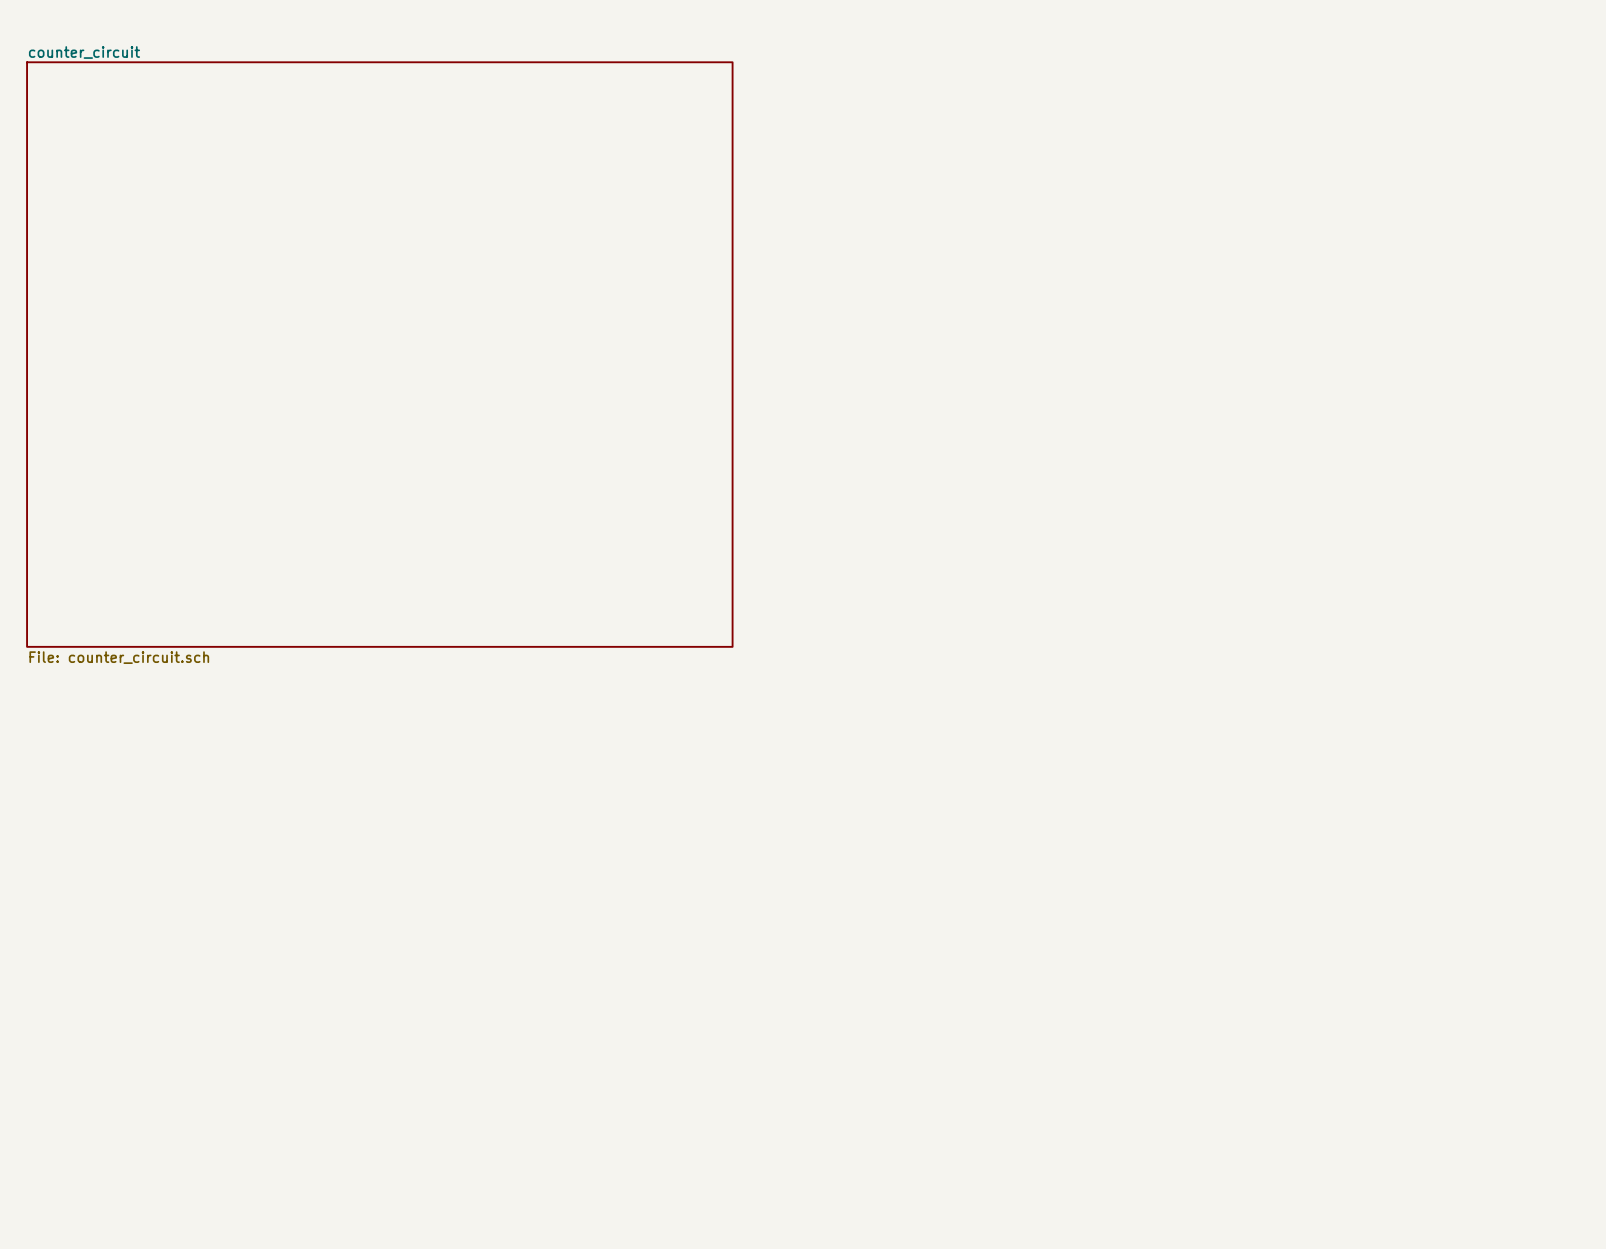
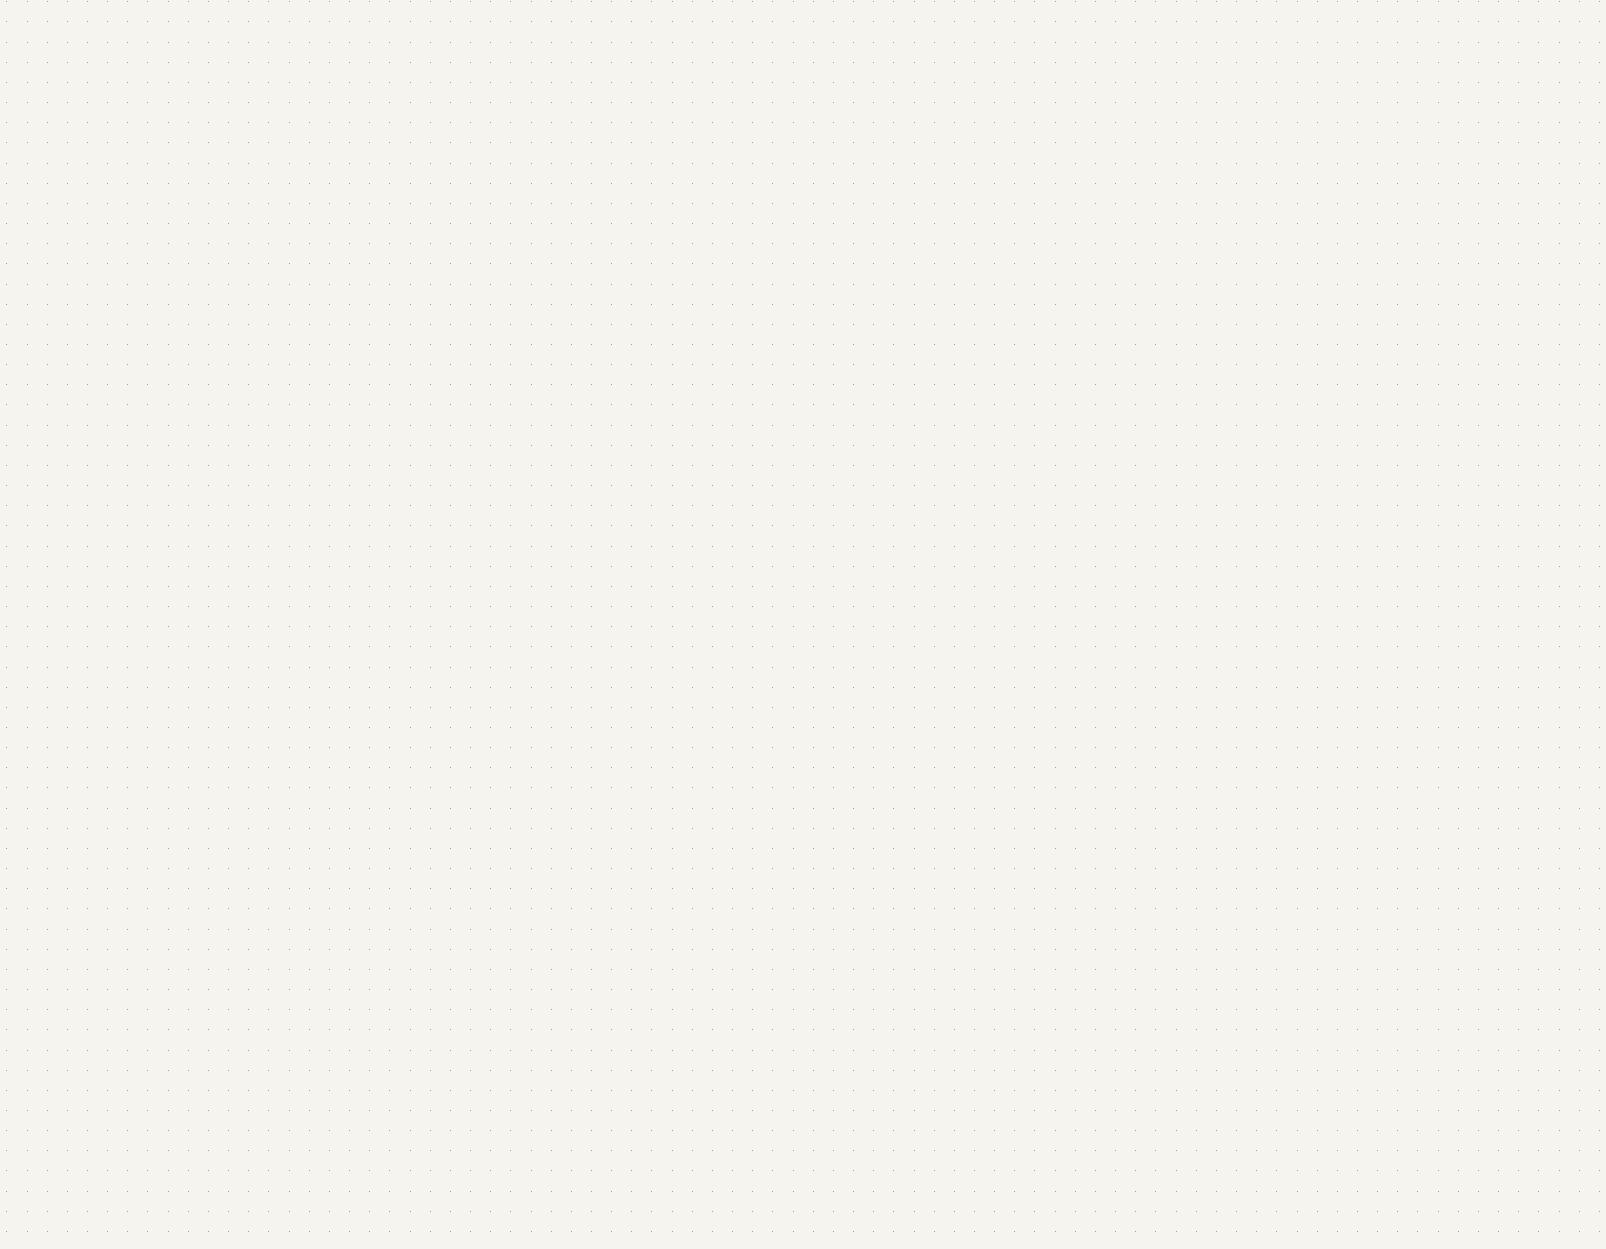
sheet counter_circuit: File: counter_circuit.sch (379, 354) -> none

